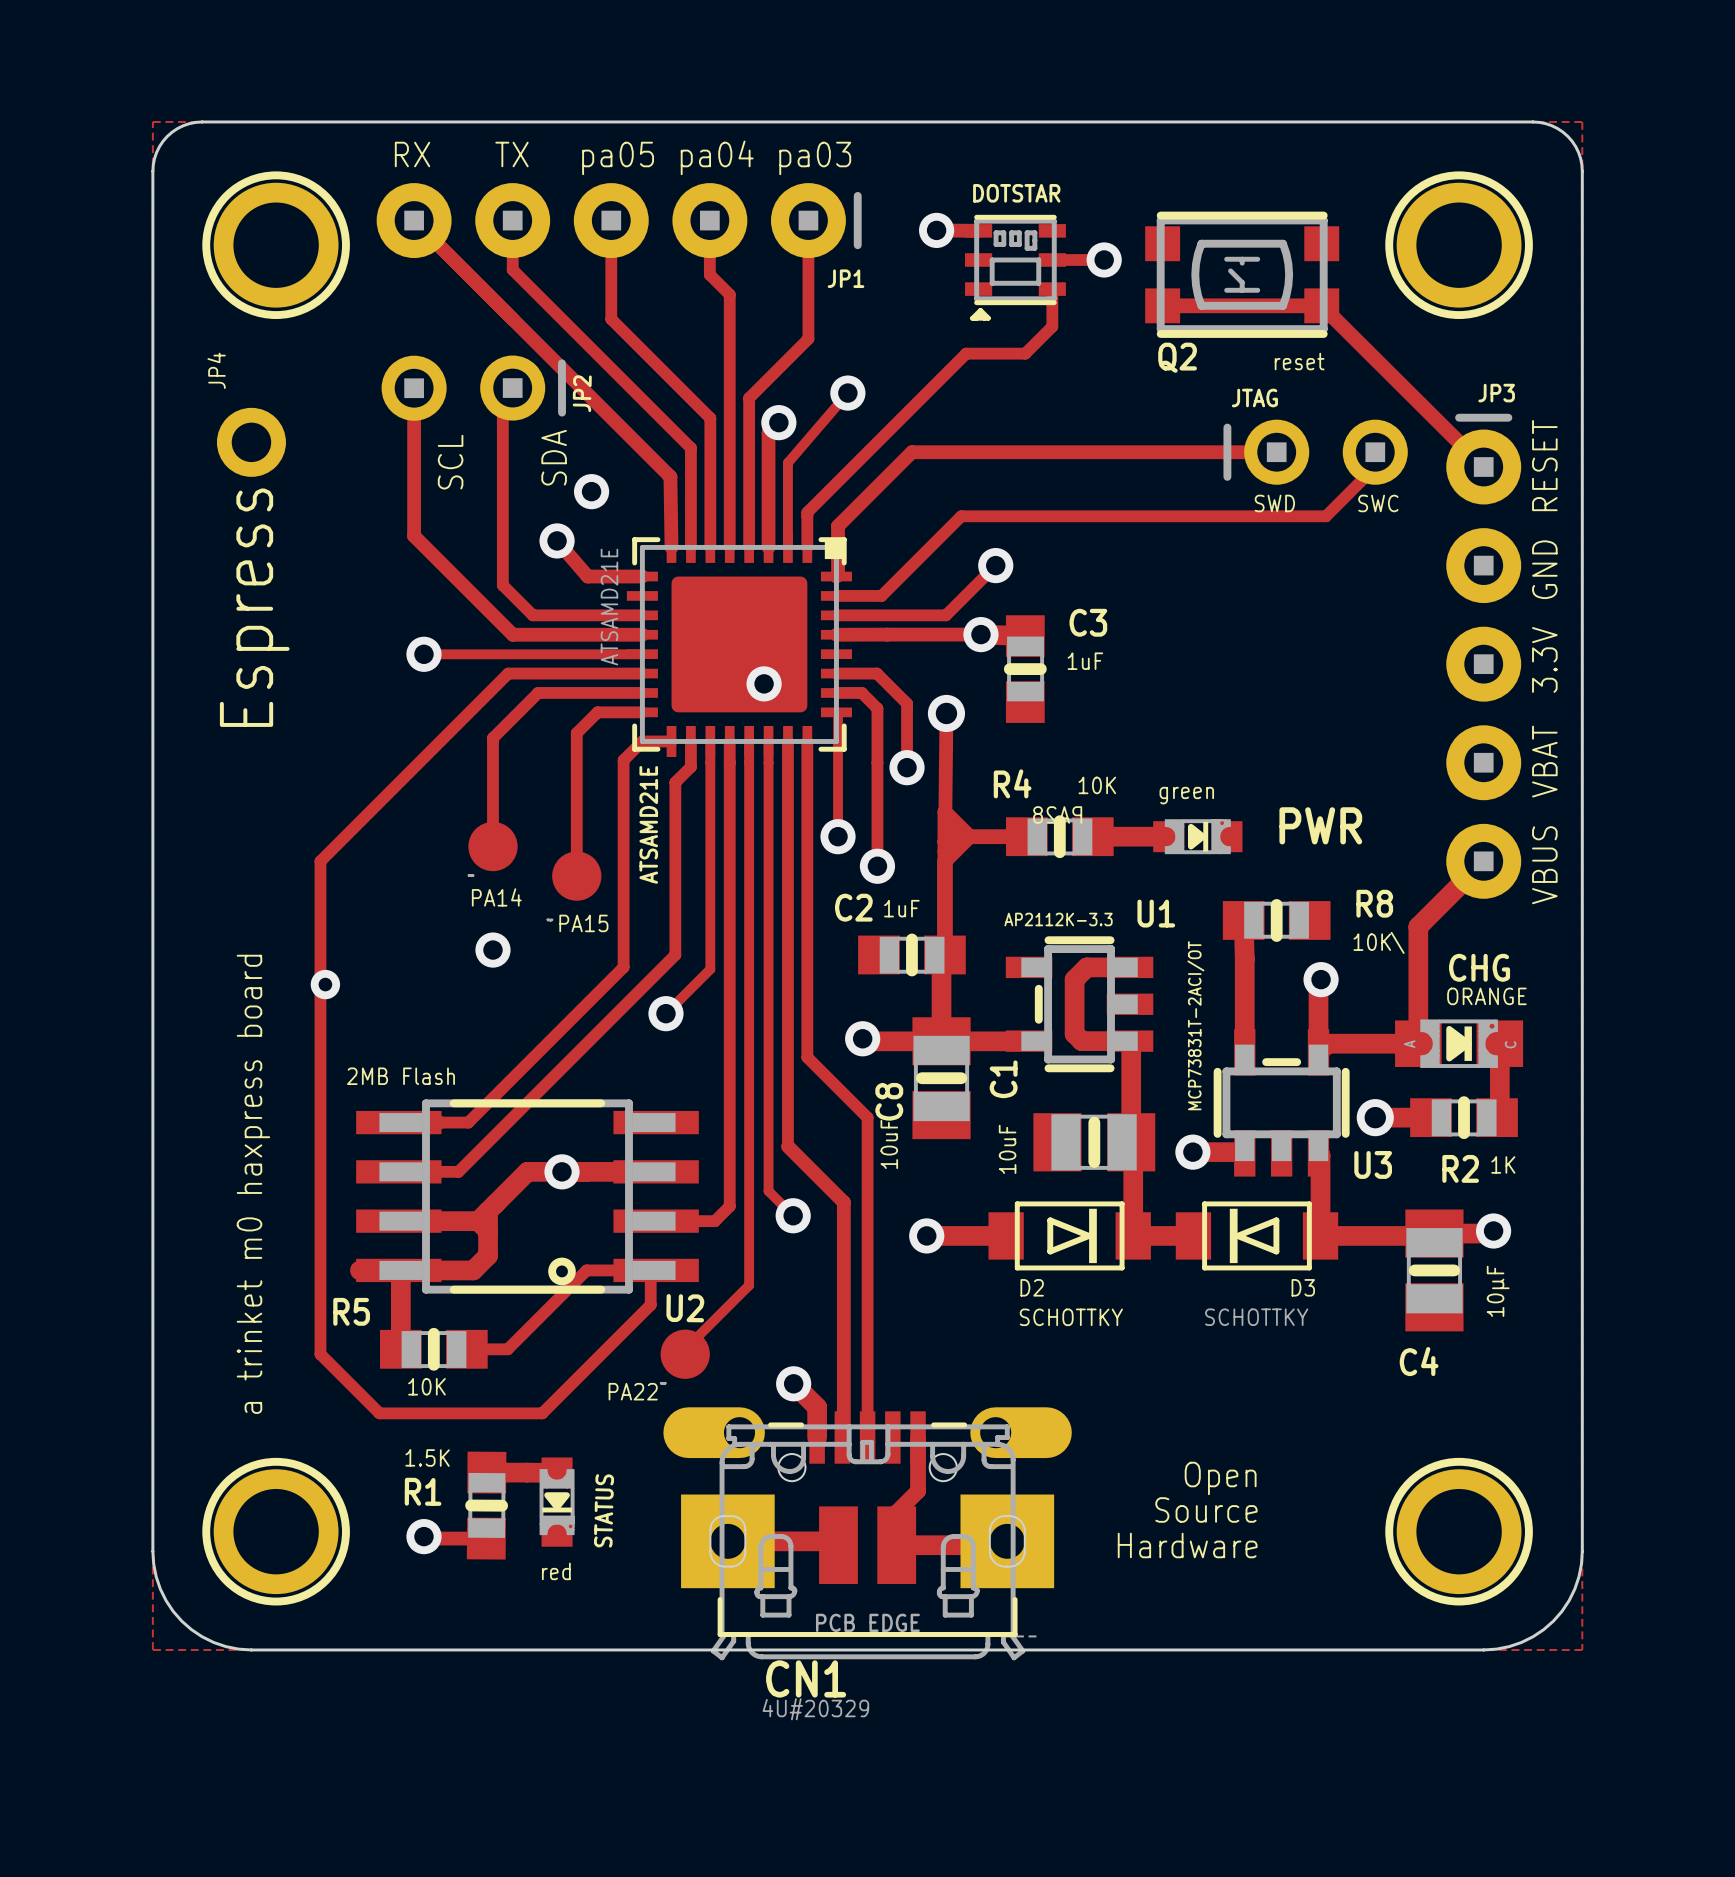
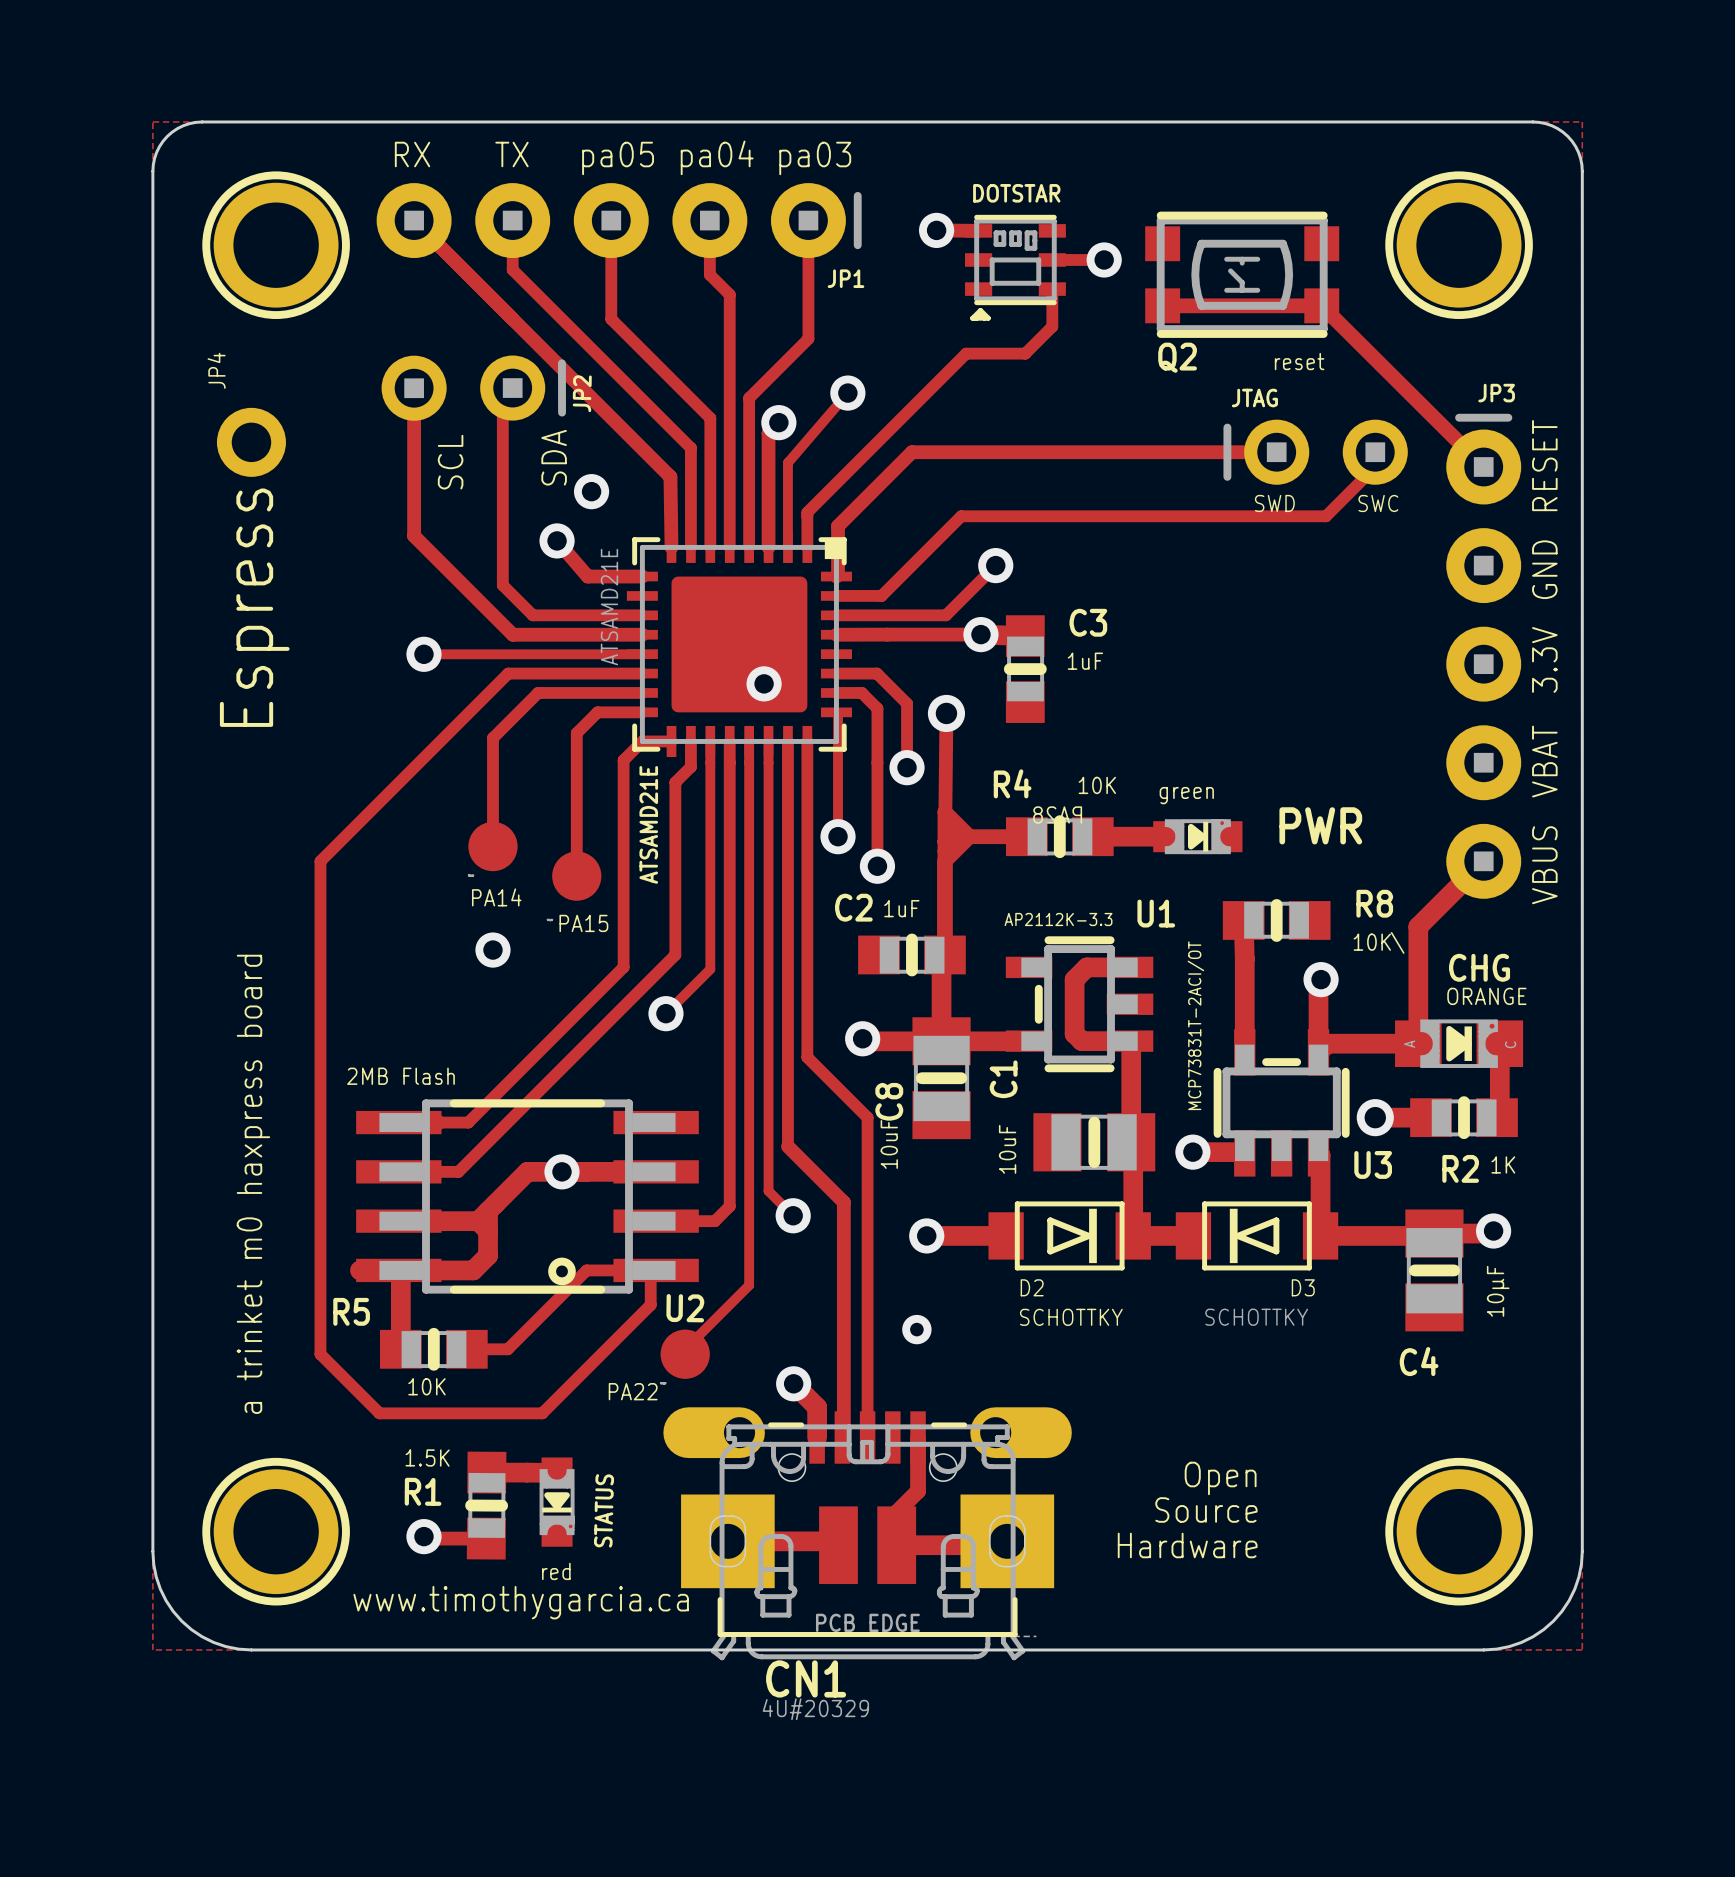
via: (325, 984) -> none
via: none -> (916, 1329)
text: none -> www.timothygarcia.ca (521, 1602)

